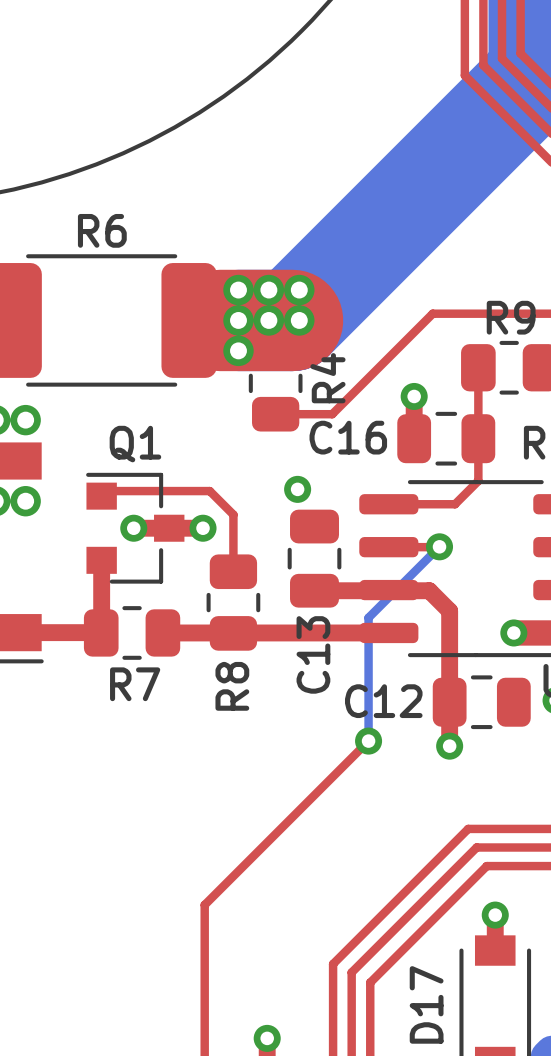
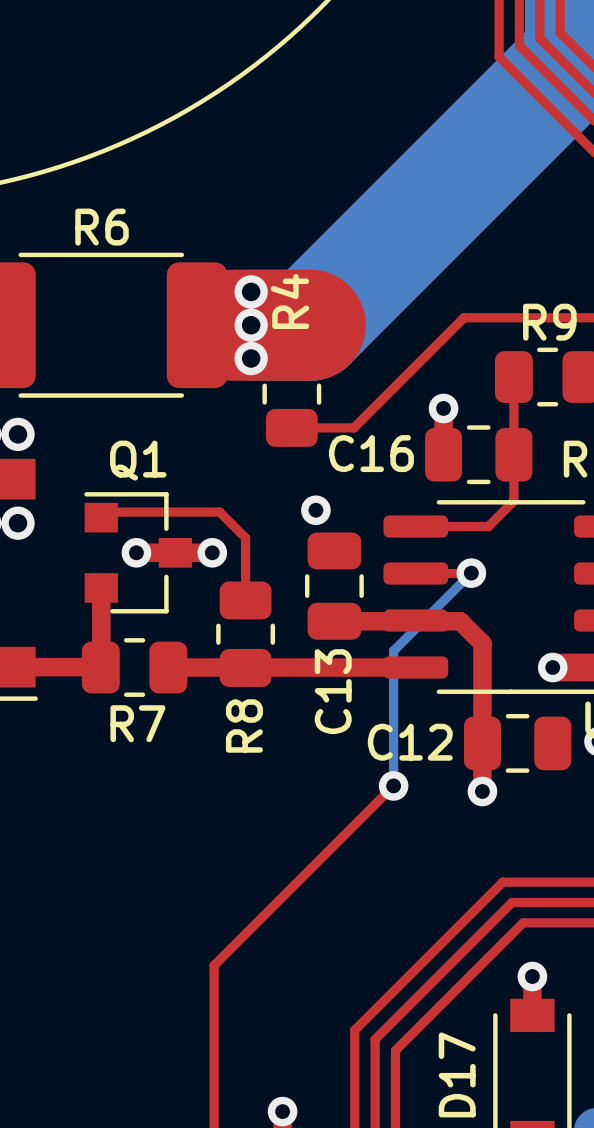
via: (268, 290) -> none
via: (299, 290) -> none
via: (268, 320) -> none
via: (299, 320) -> none
R4 name position: R4 (327, 378) -> R4 (289, 301)

